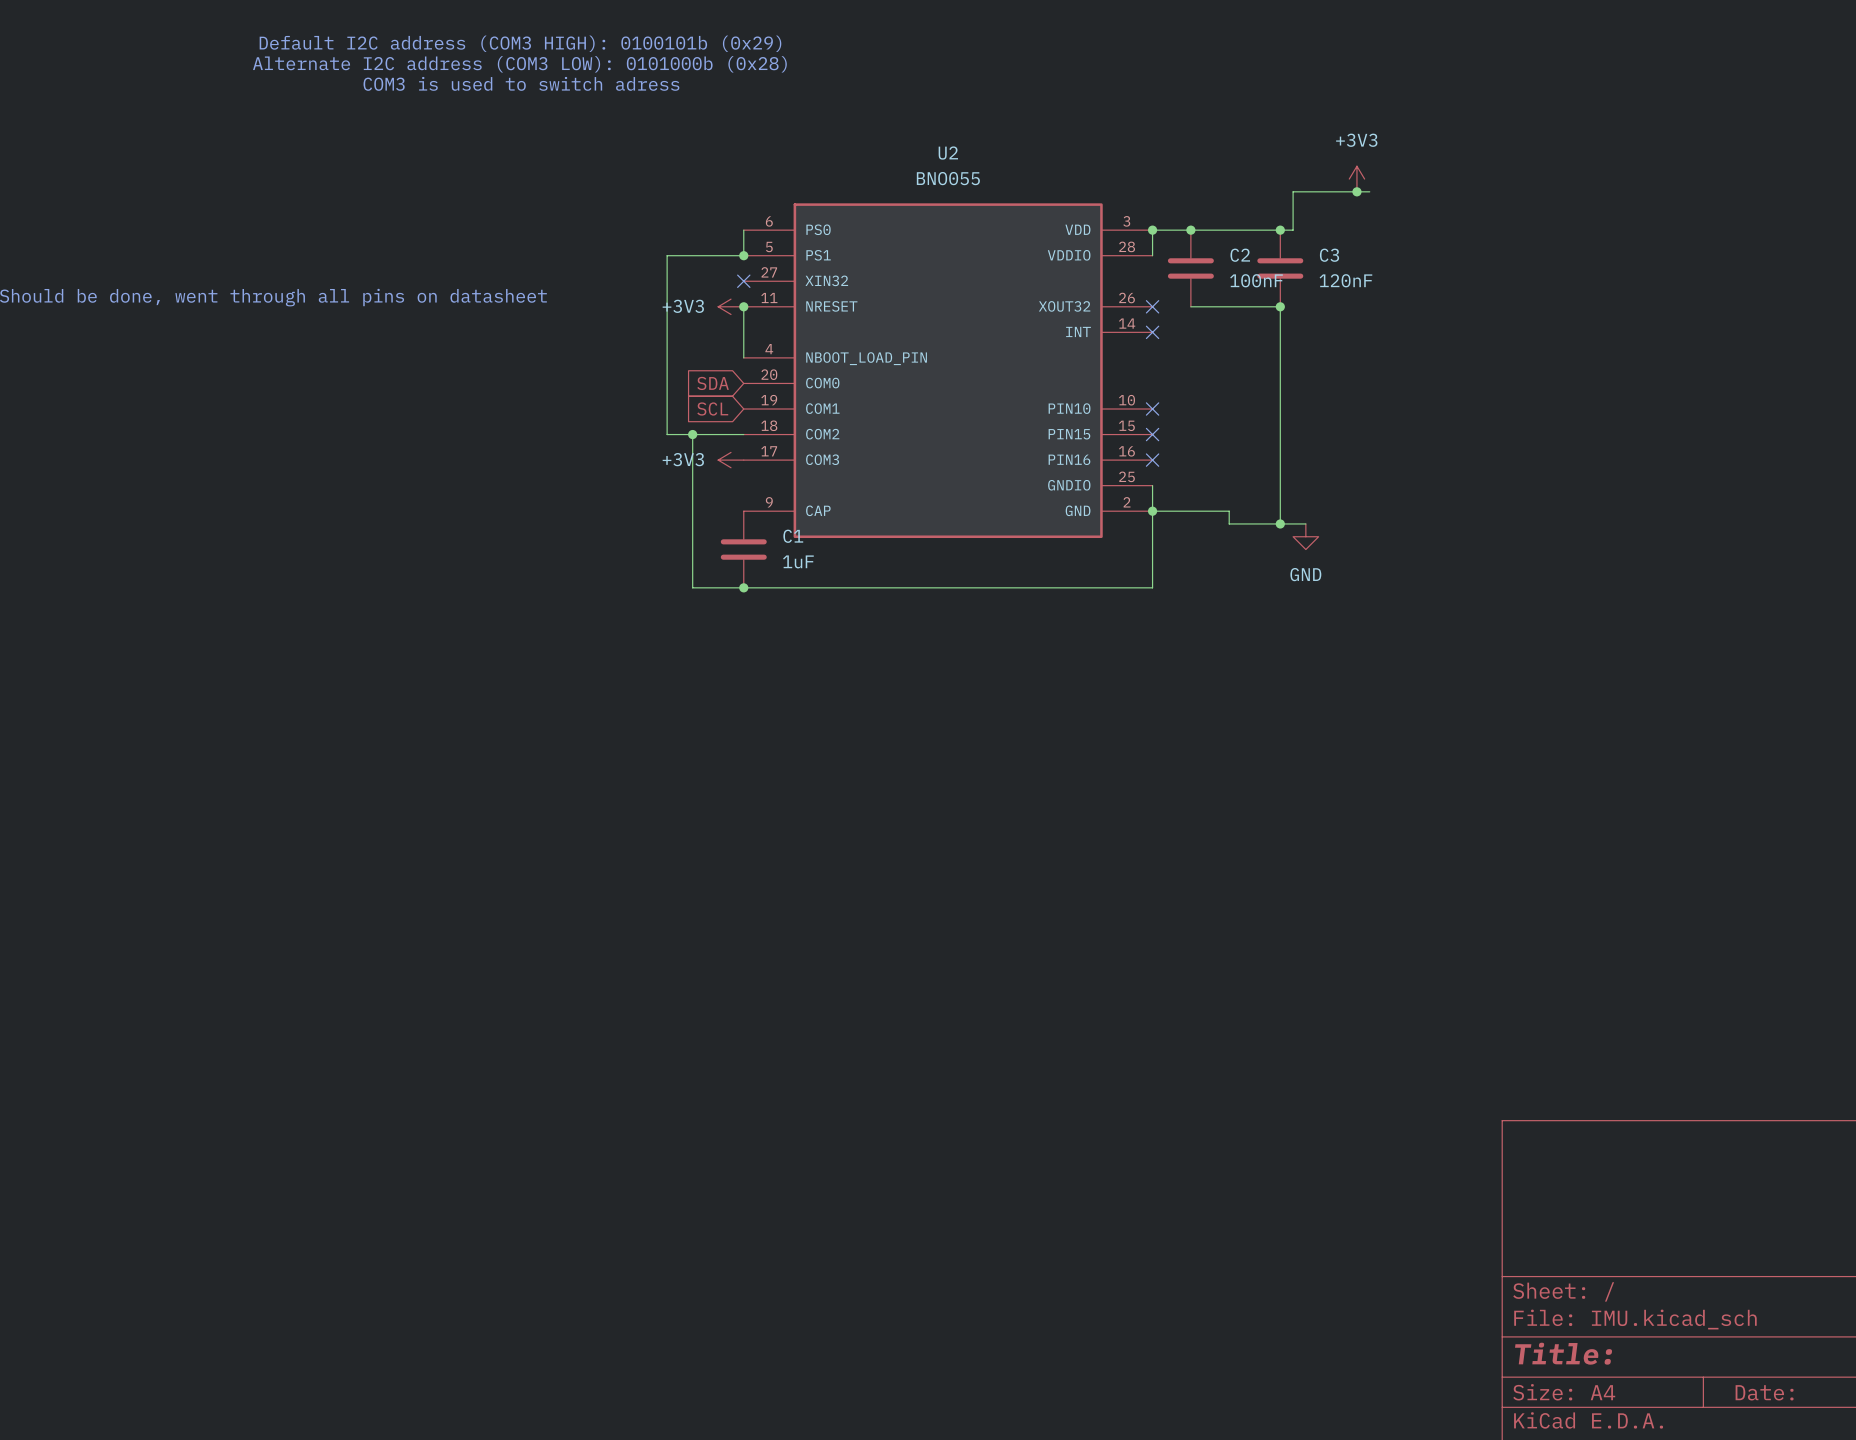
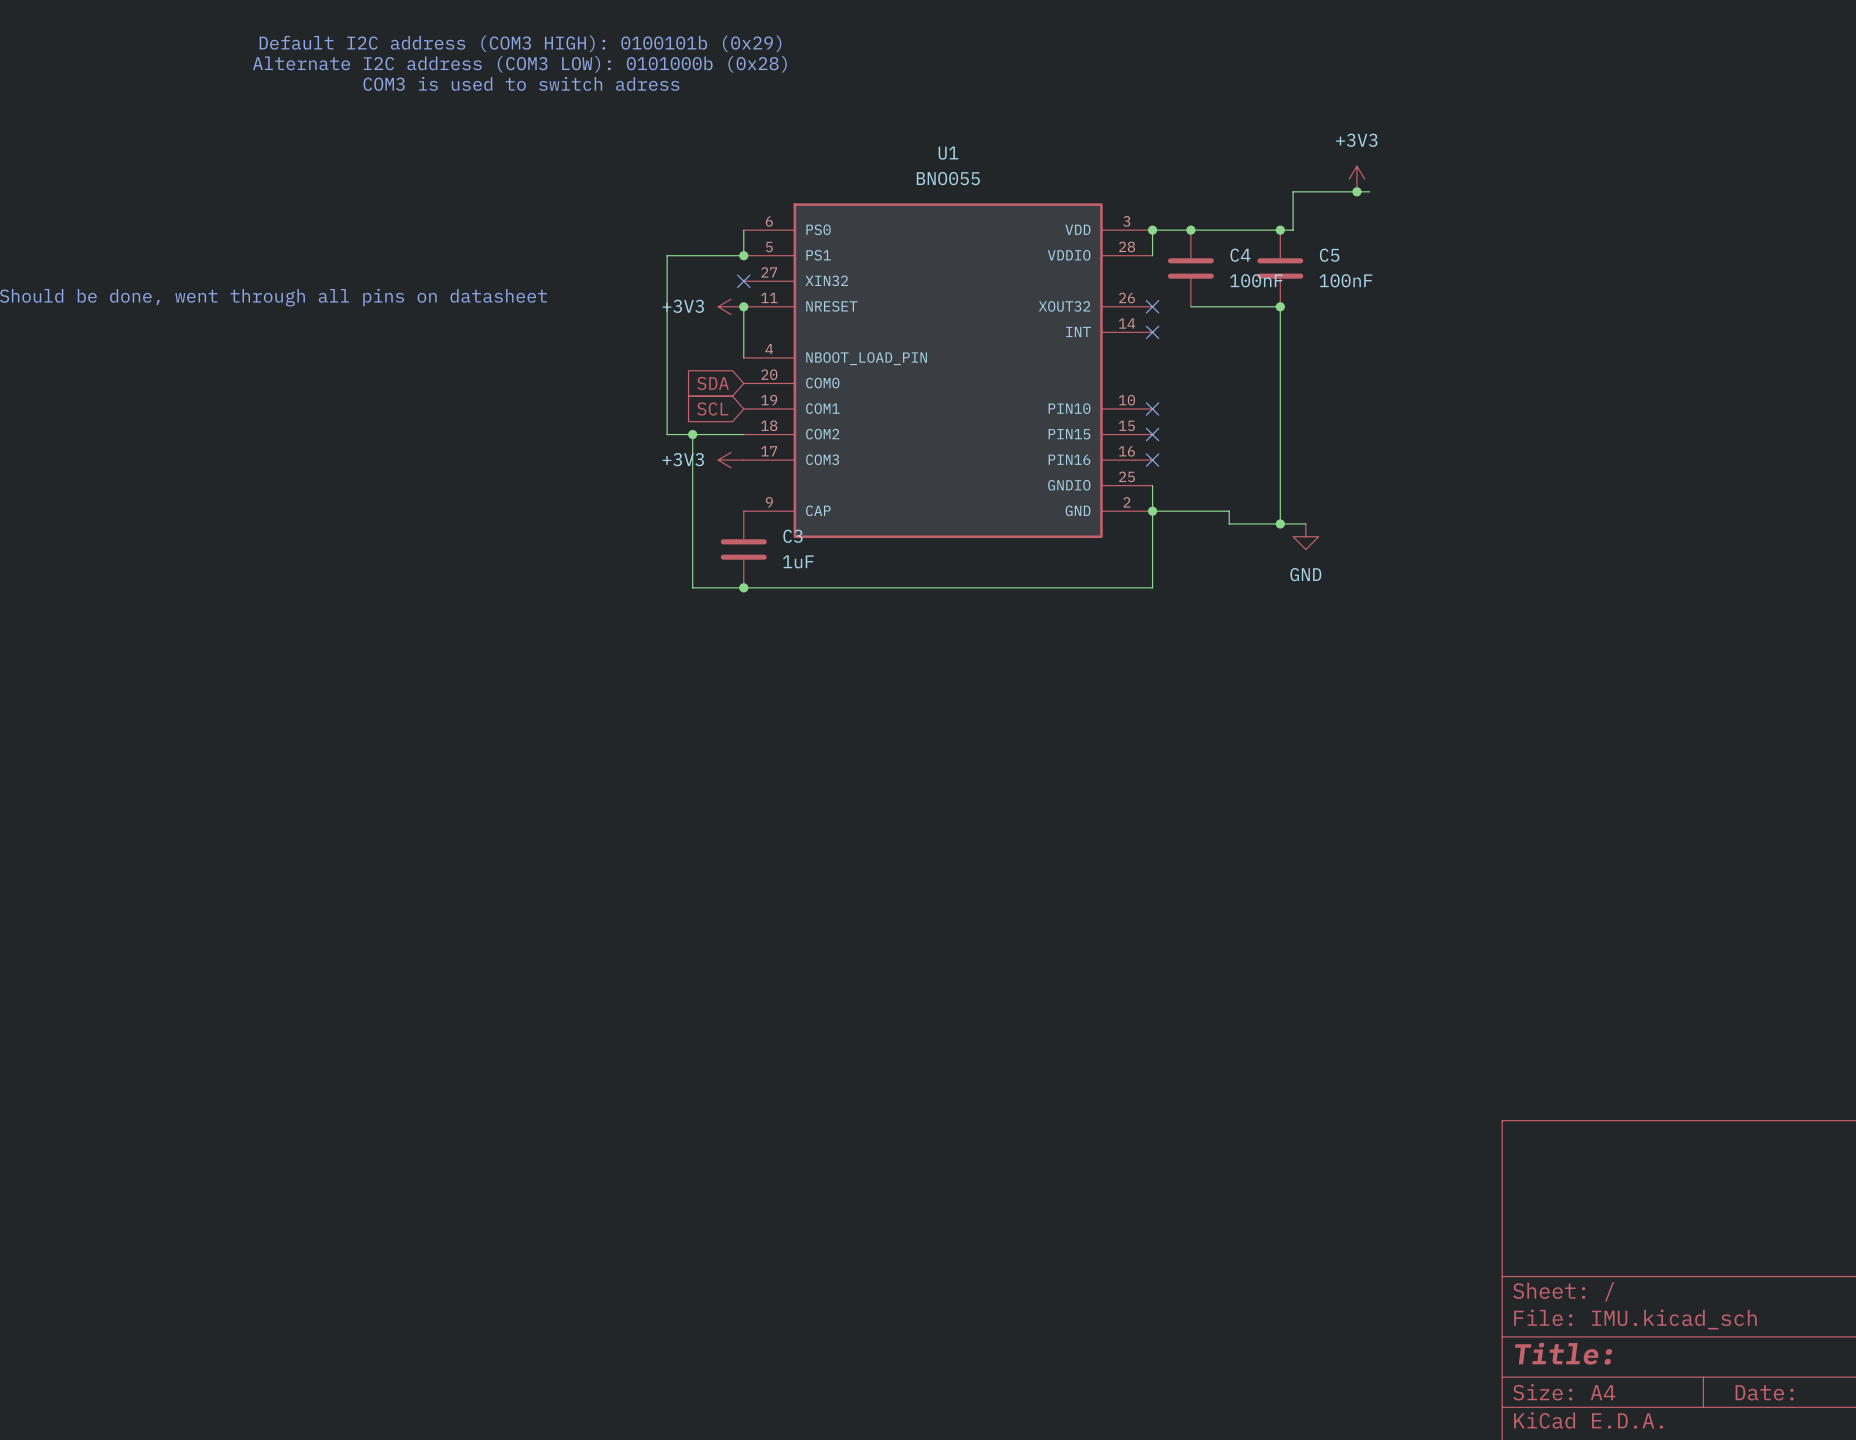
U2 name: U2 (948, 153) -> U1 (948, 153)
C2 name: C2 (1240, 255) -> C4 (1240, 255)
C3 name: C3 (1329, 255) -> C5 (1329, 255)
C3 value: 120nF (1345, 280) -> 100nF (1345, 280)
C1 name: C1 (793, 536) -> C3 (792, 536)

